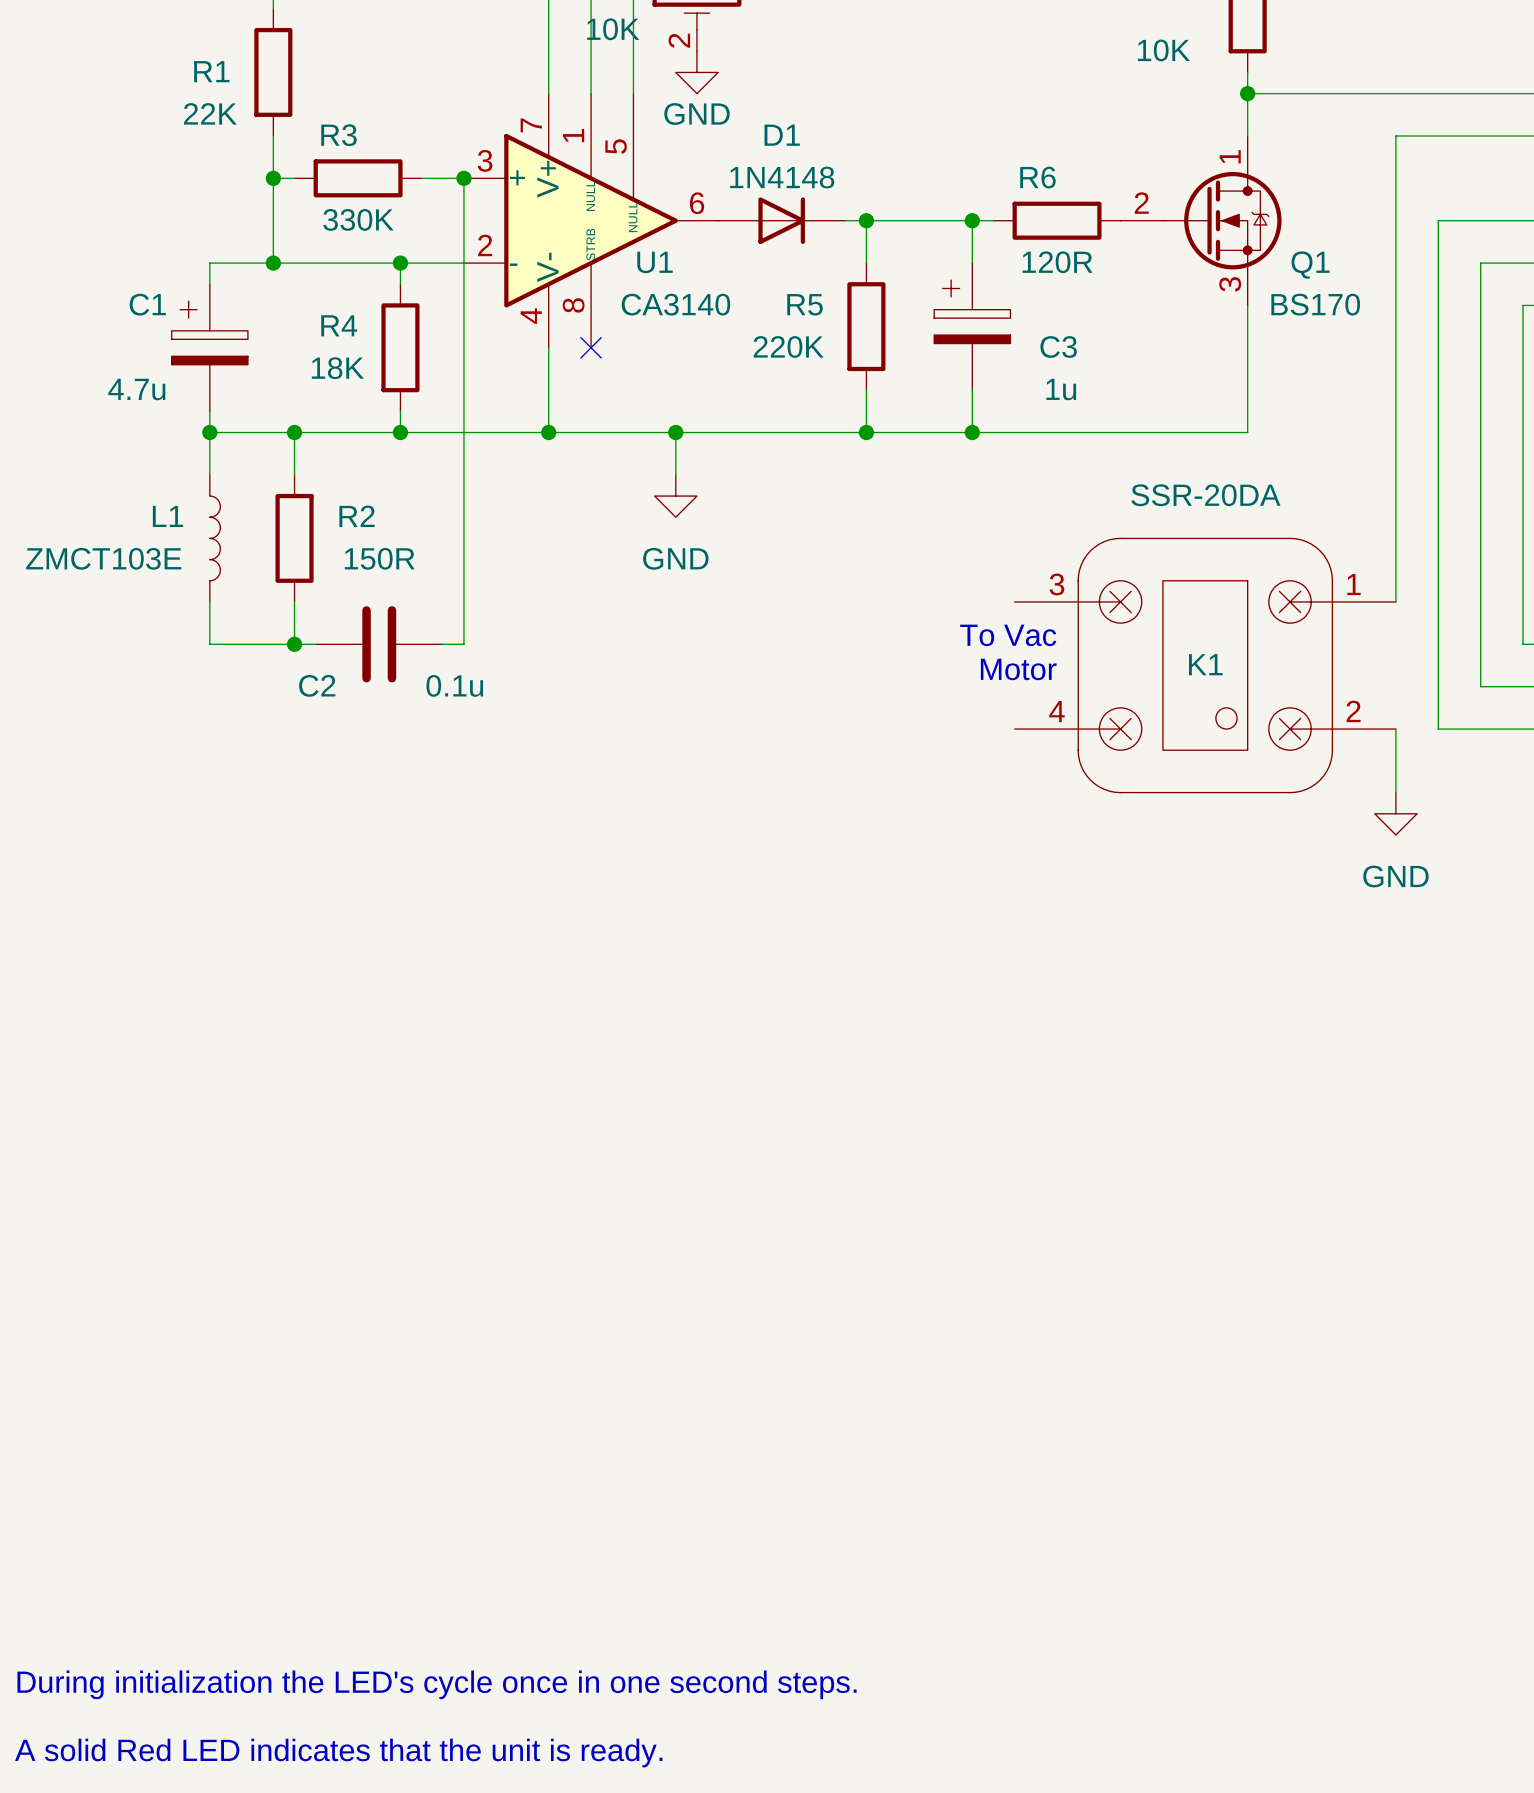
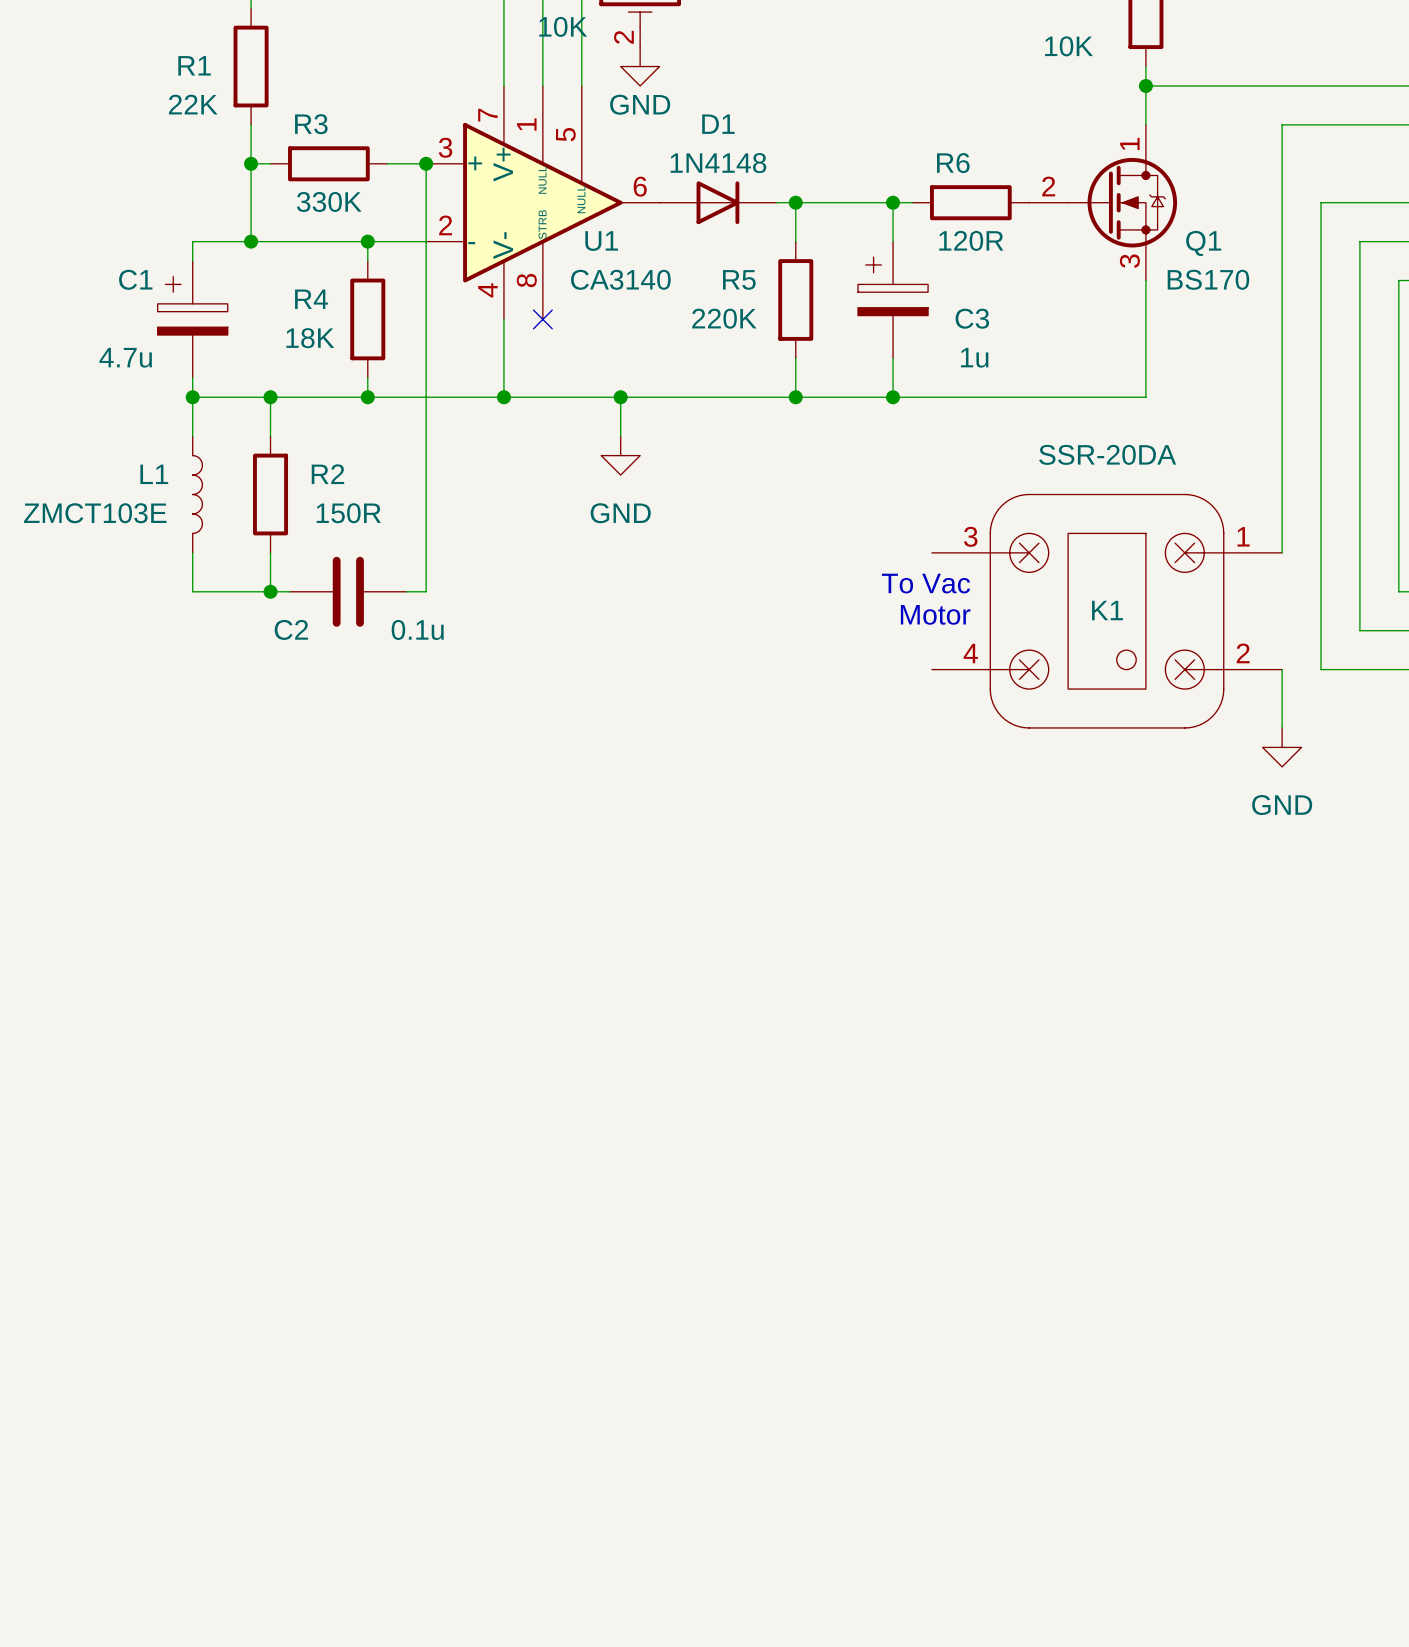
text: During initialization the LED's cycle once in one second steps. (437, 1684) -> none
text: A solid Red LED indicates that the unit is ready. (338, 1753) -> none

